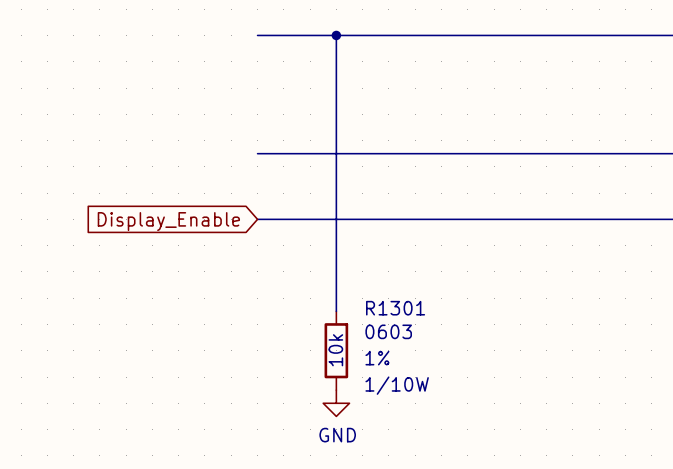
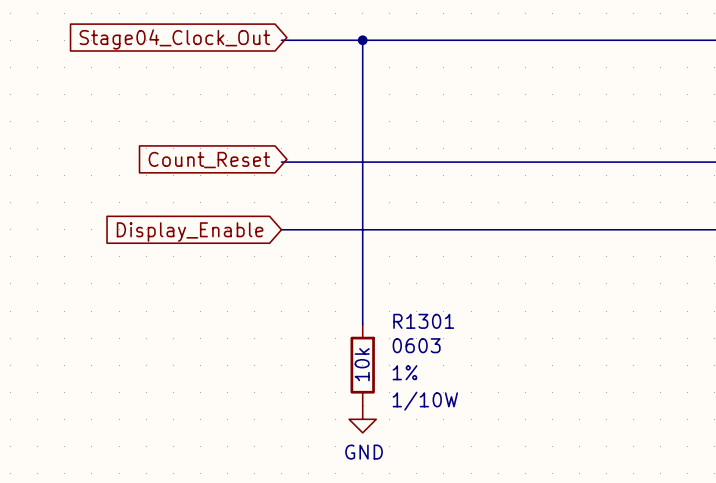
global label: none -> Stage04_Clock_Out (174, 39)
global label: none -> Count_Reset (209, 160)

